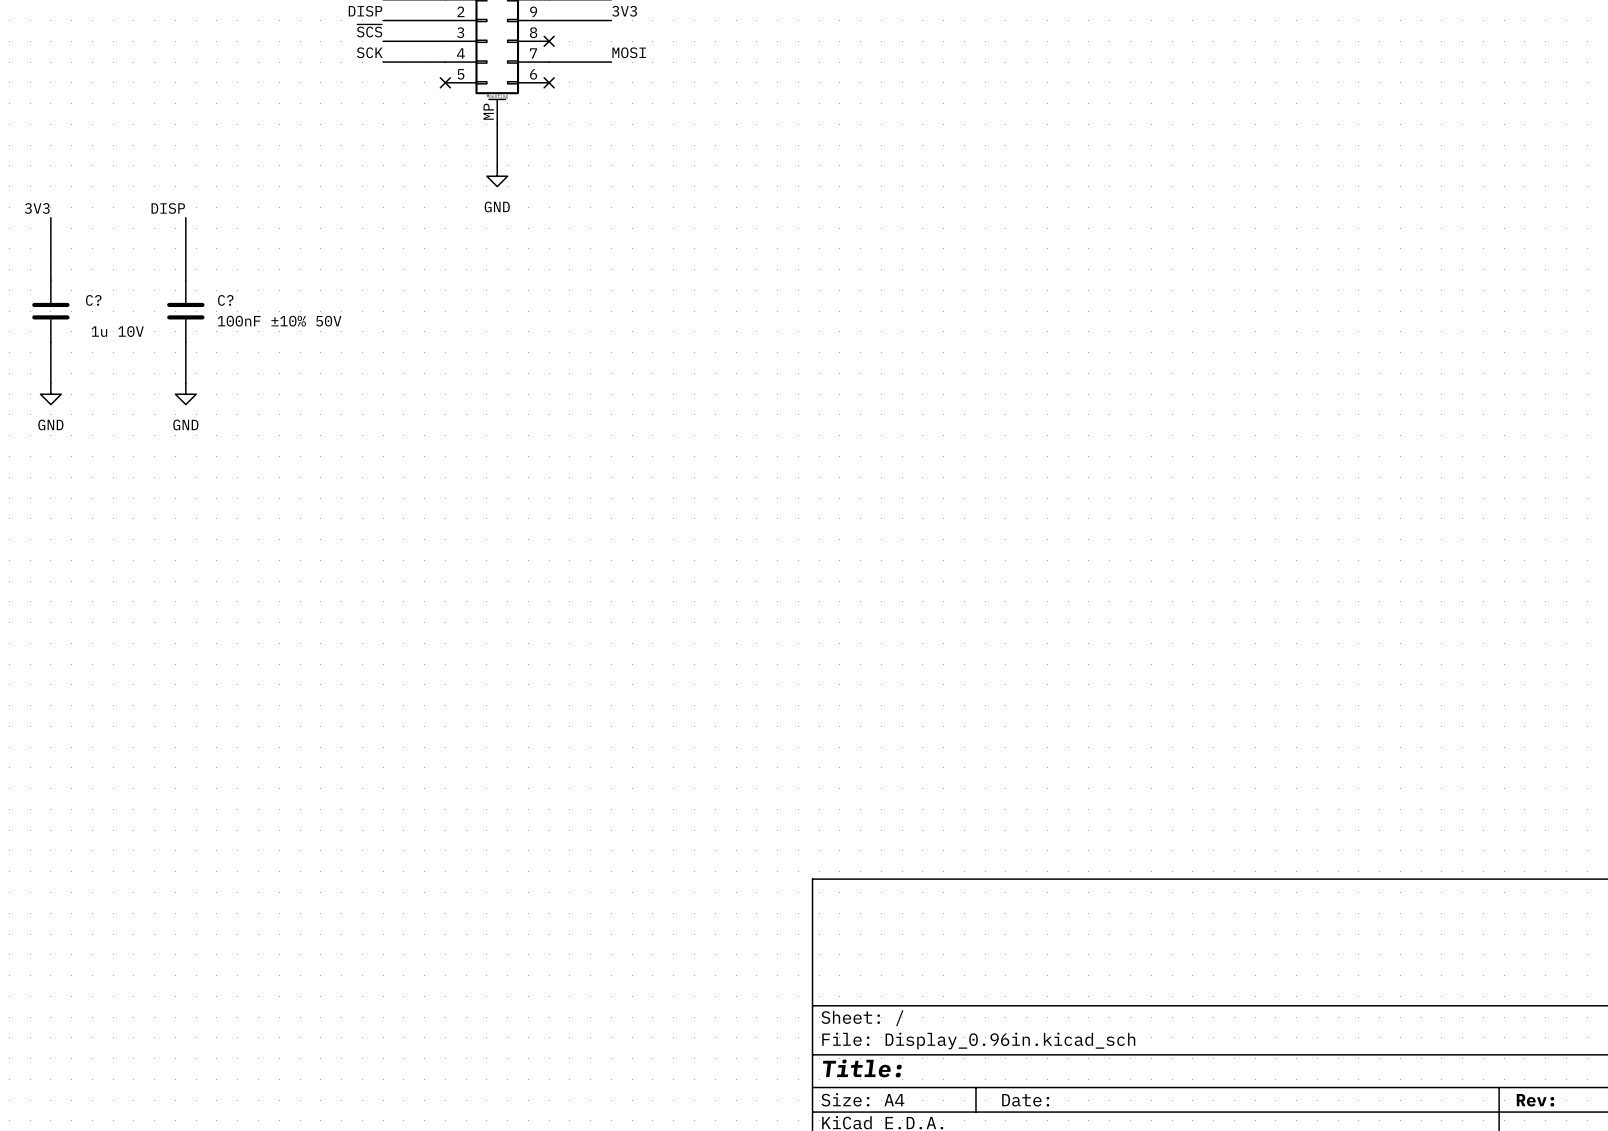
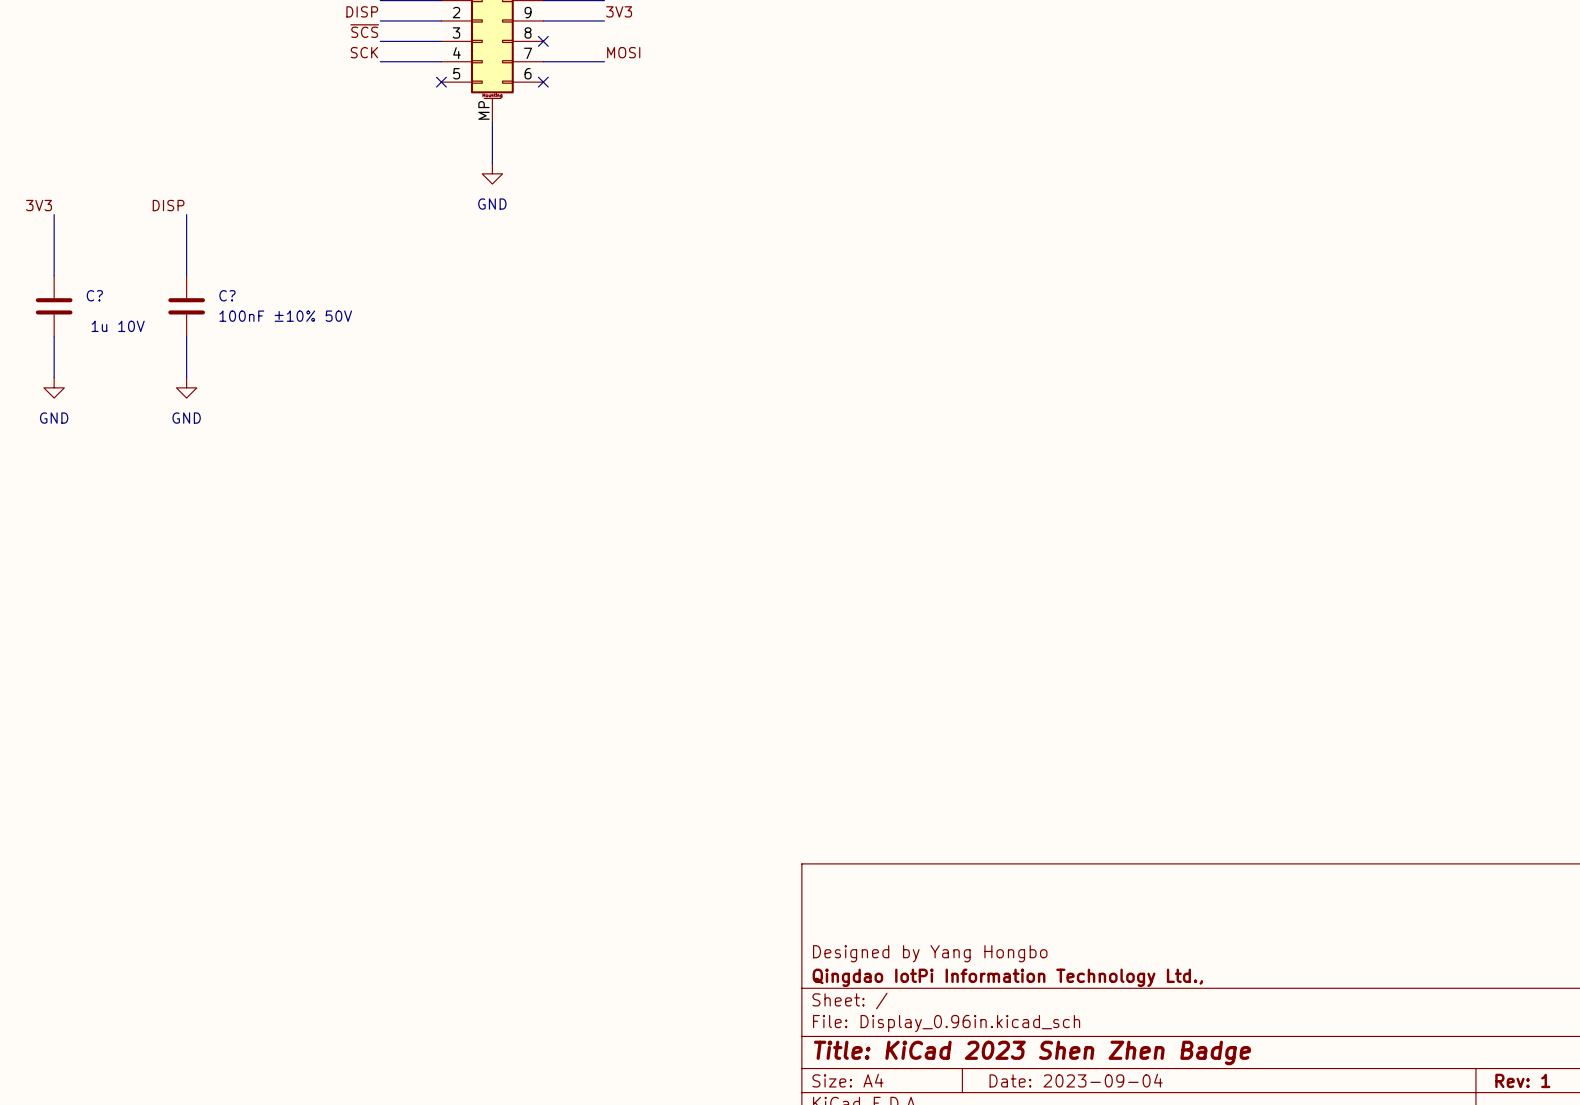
title block: none -> Designed by Yang Hongbo (930, 953)
title block: none -> Qingdao IotPi Information Technology Ltd., (1007, 977)
title block: Title: (862, 1068) -> Title: KiCad 2023 Shen Zhen Badge (1032, 1052)
title block: Date: (1025, 1100) -> Date: 2023-09-04 (1076, 1080)
title block: Rev: (1535, 1100) -> Rev: 1 (1522, 1080)

